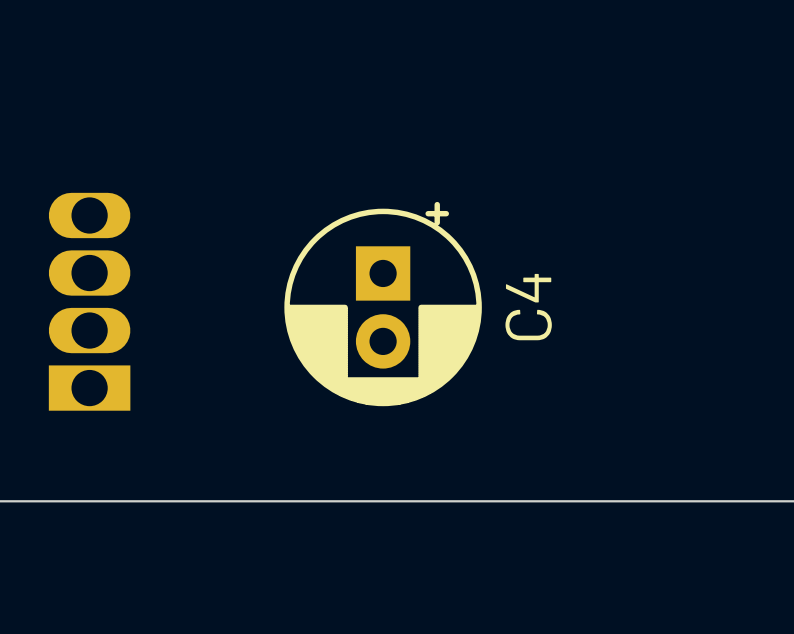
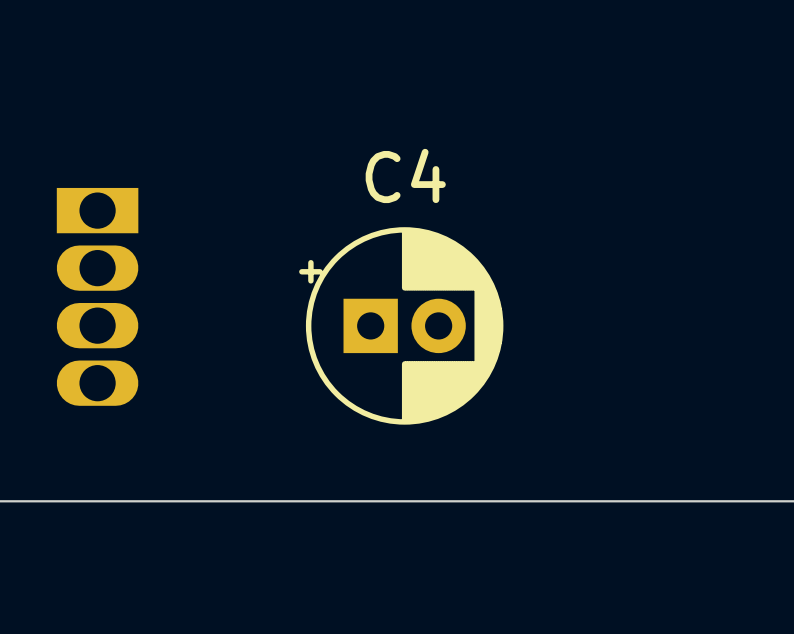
part rotation: 0° (89, 301) -> 180° (97, 296)
C4 rotation: 0° (383, 304) -> 90° counterclockwise (401, 325)

